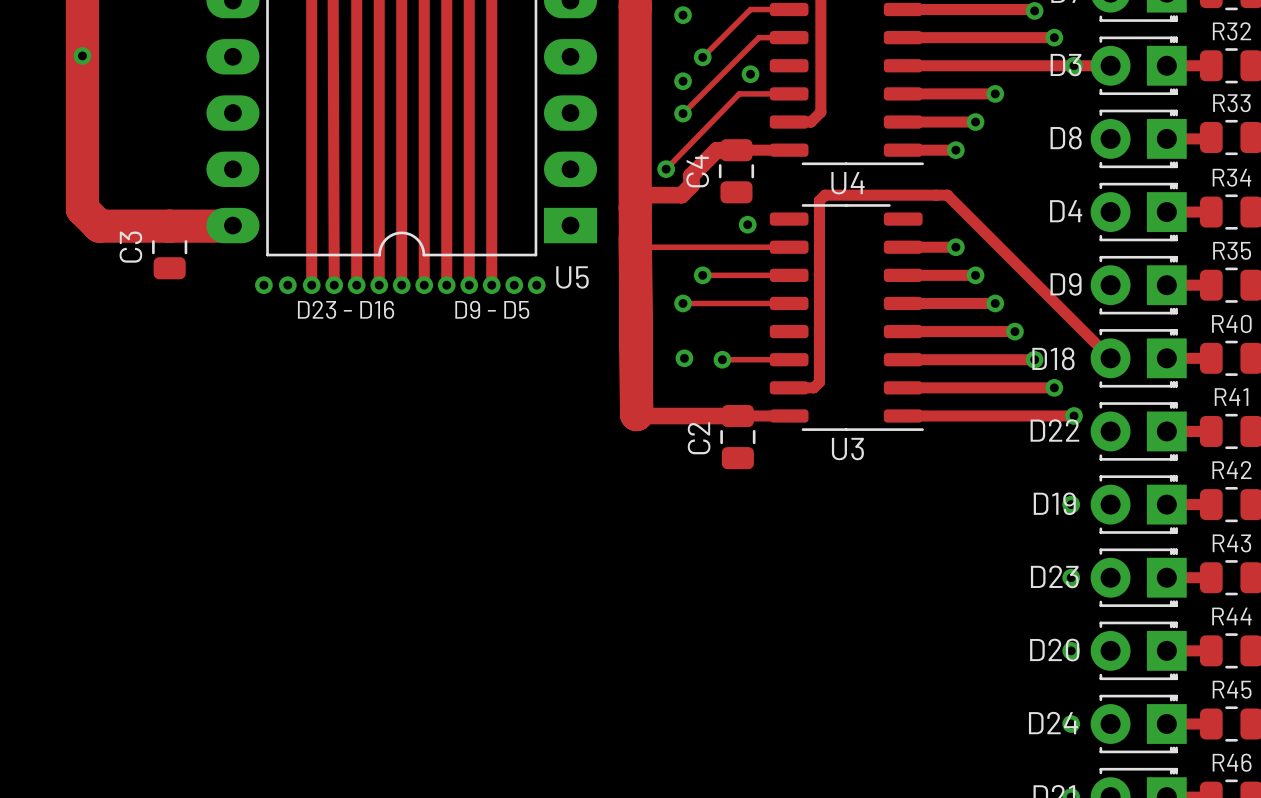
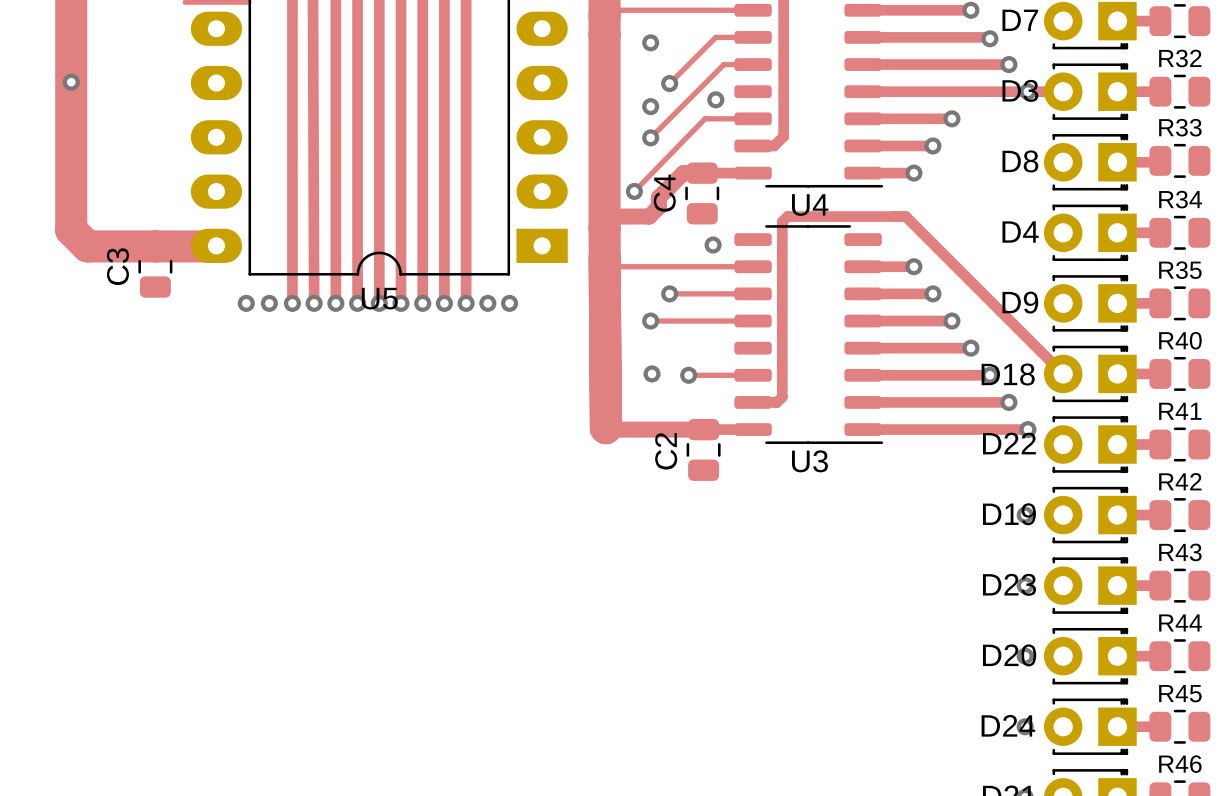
U5 name position: U5 (572, 277) -> U5 (379, 298)
text: D23 - D16 (346, 309) -> none
text: D9 - D5 (492, 309) -> none

